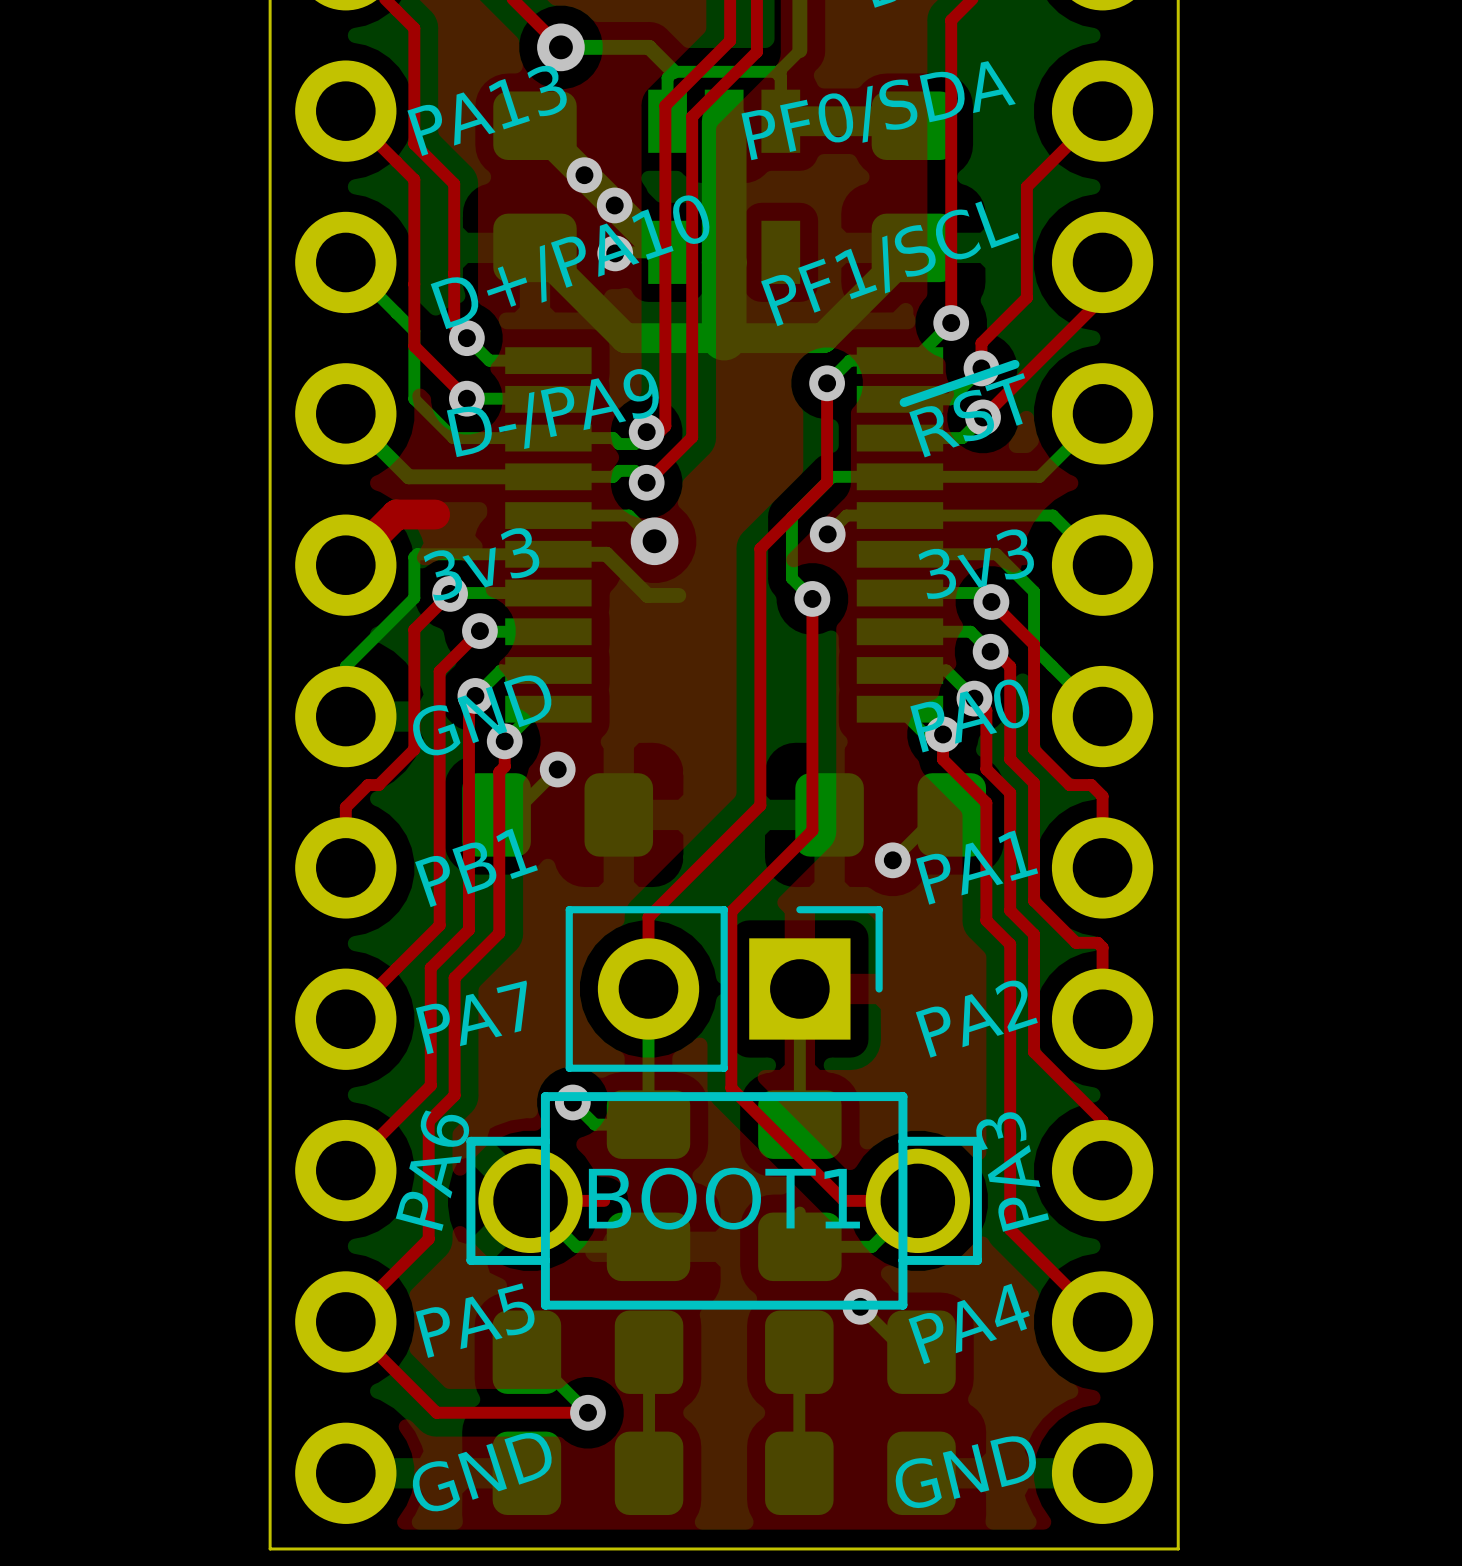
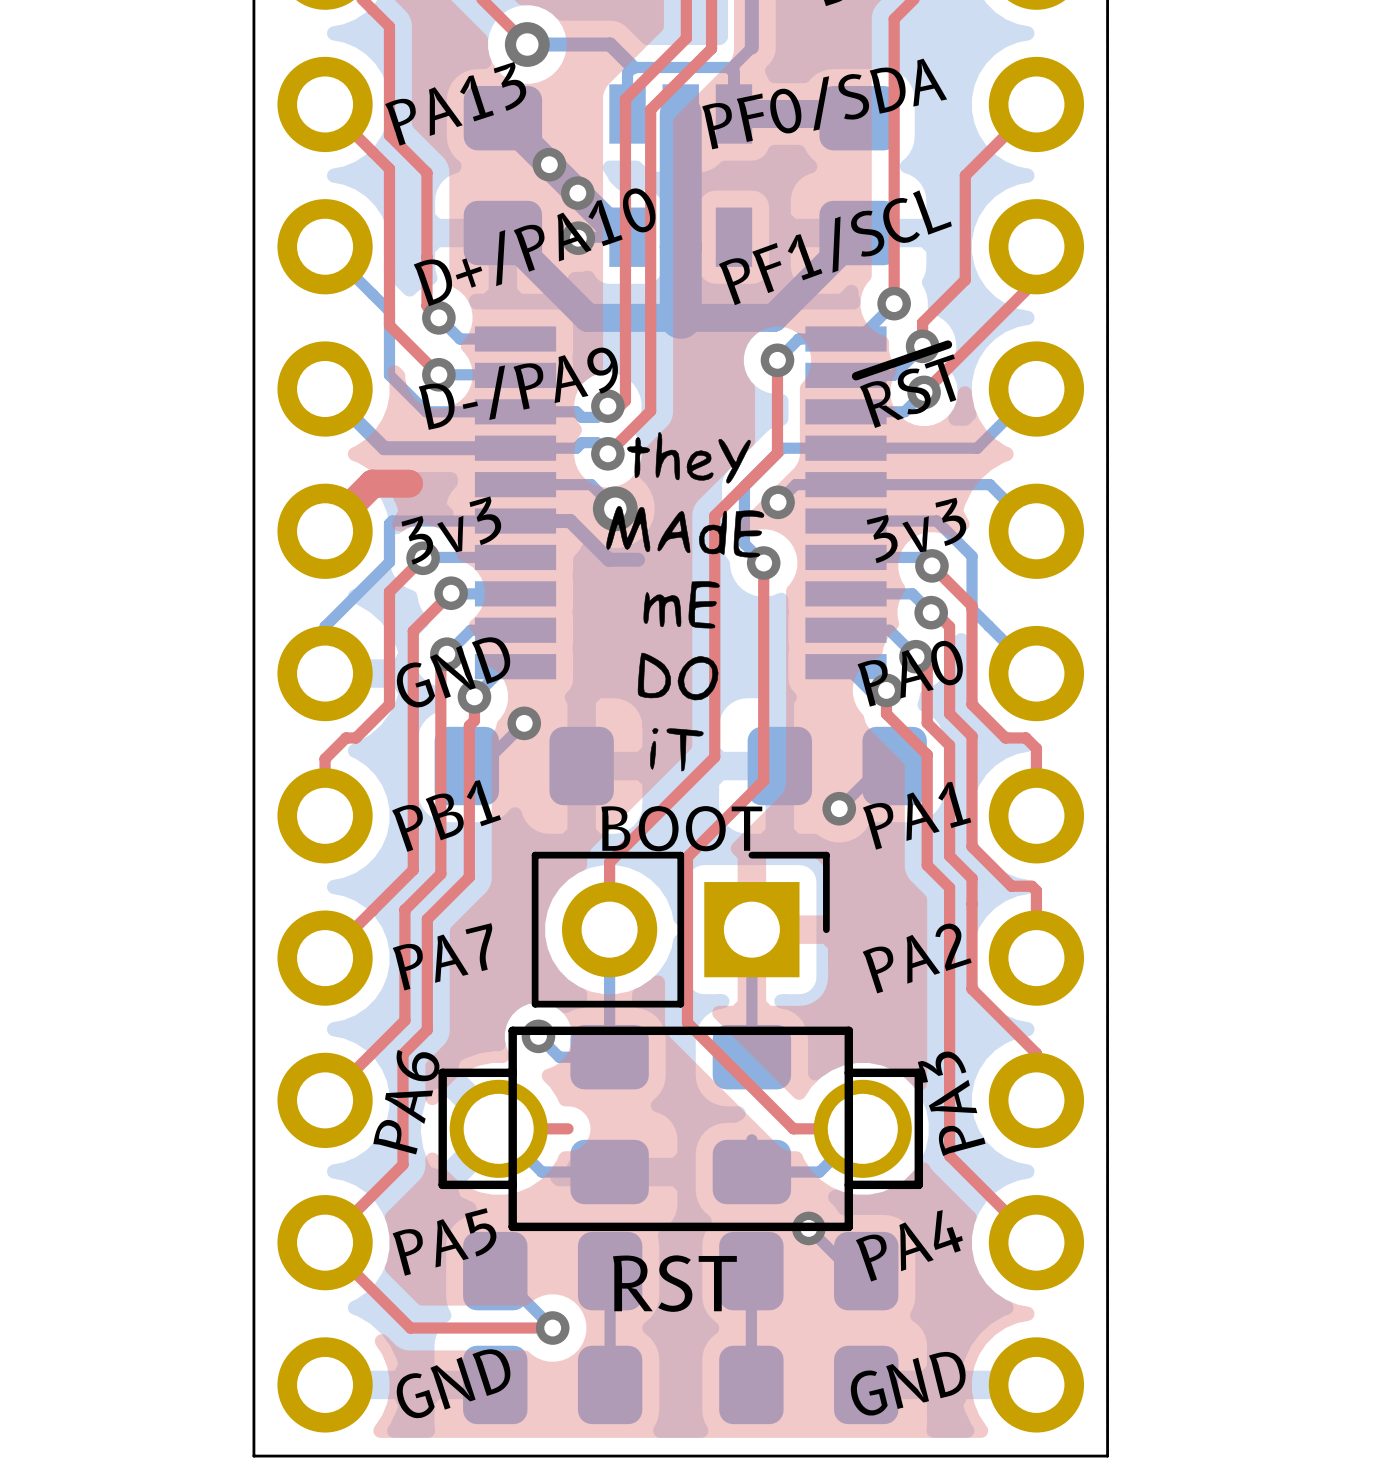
drawing: none -> [606, 432, 765, 772]
text: none -> BOOT (681, 828)
BOOT1 name: BOOT1 (724, 1198) -> RST (674, 1283)

